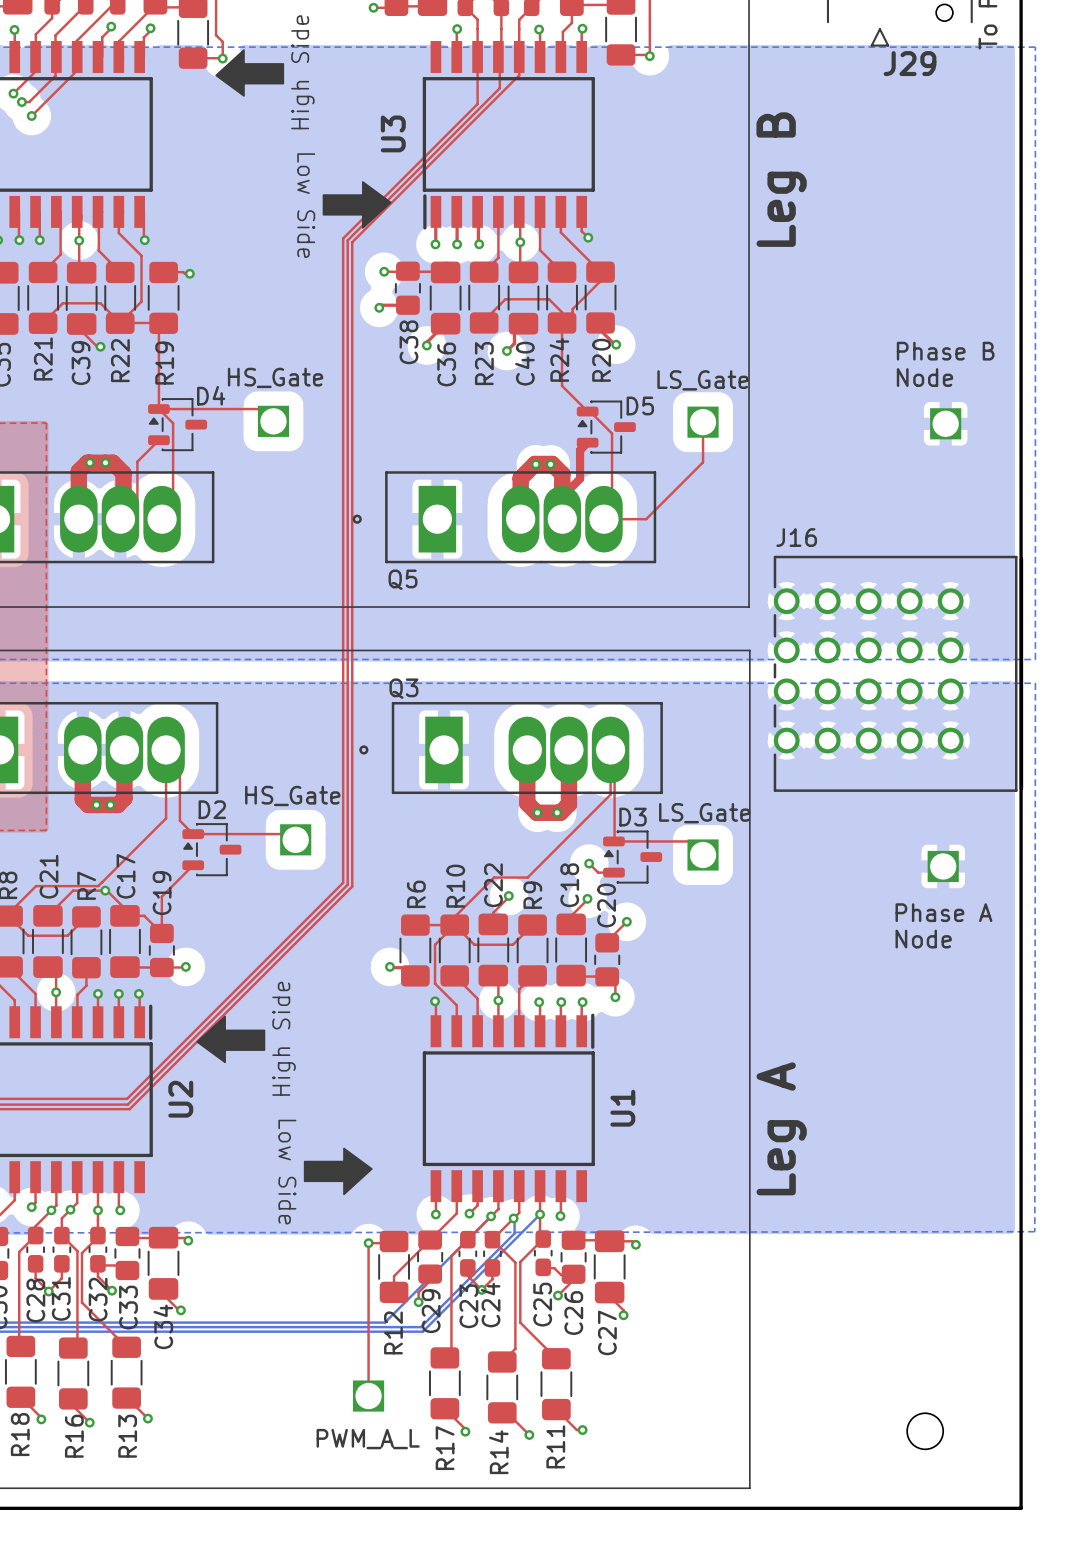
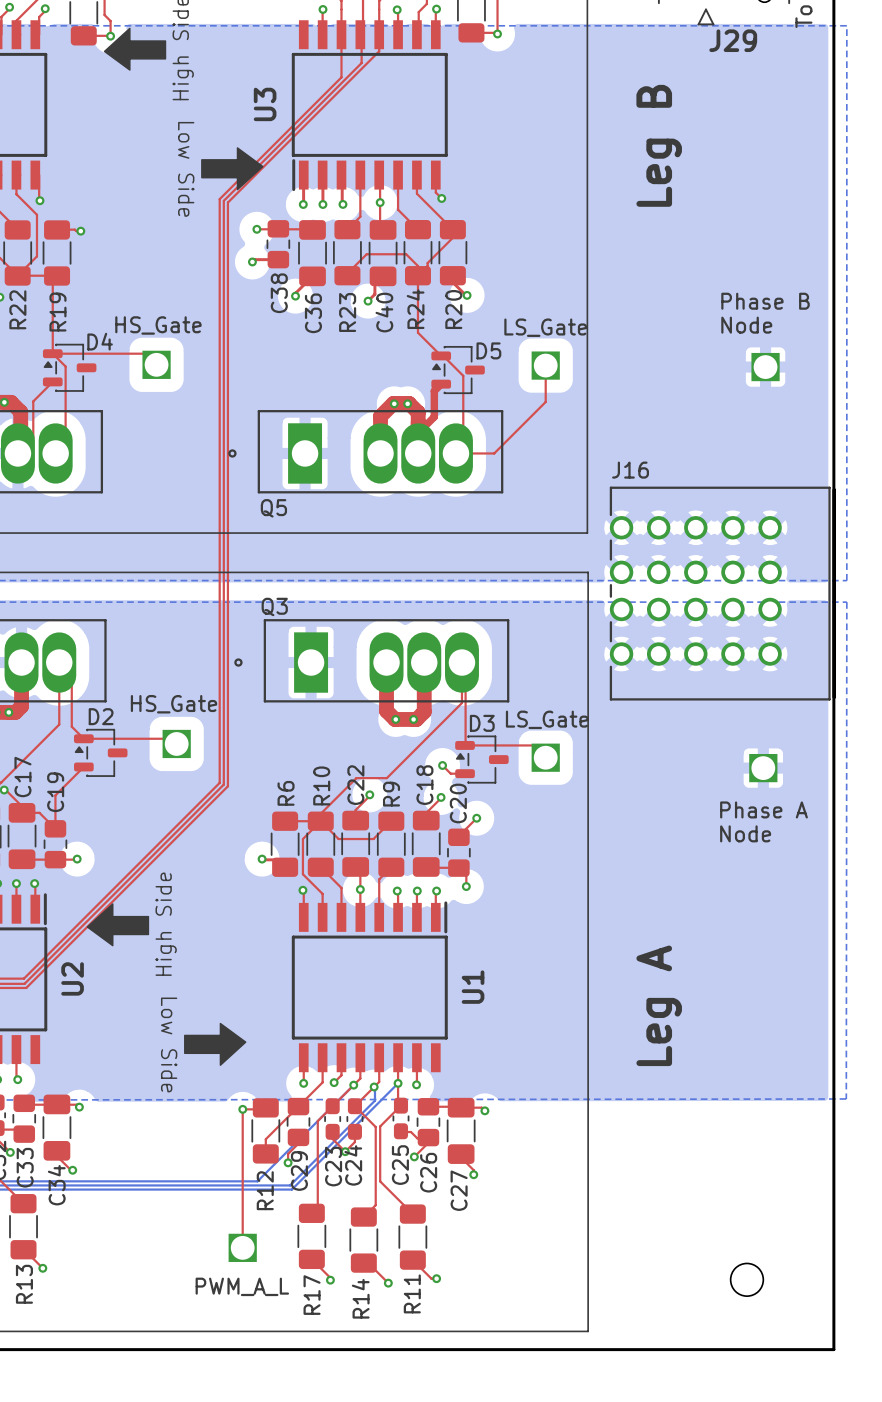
text position: Leg B (781, 179) -> Leg B (659, 145)
text position: Leg A (781, 1128) -> Leg A (659, 1005)

